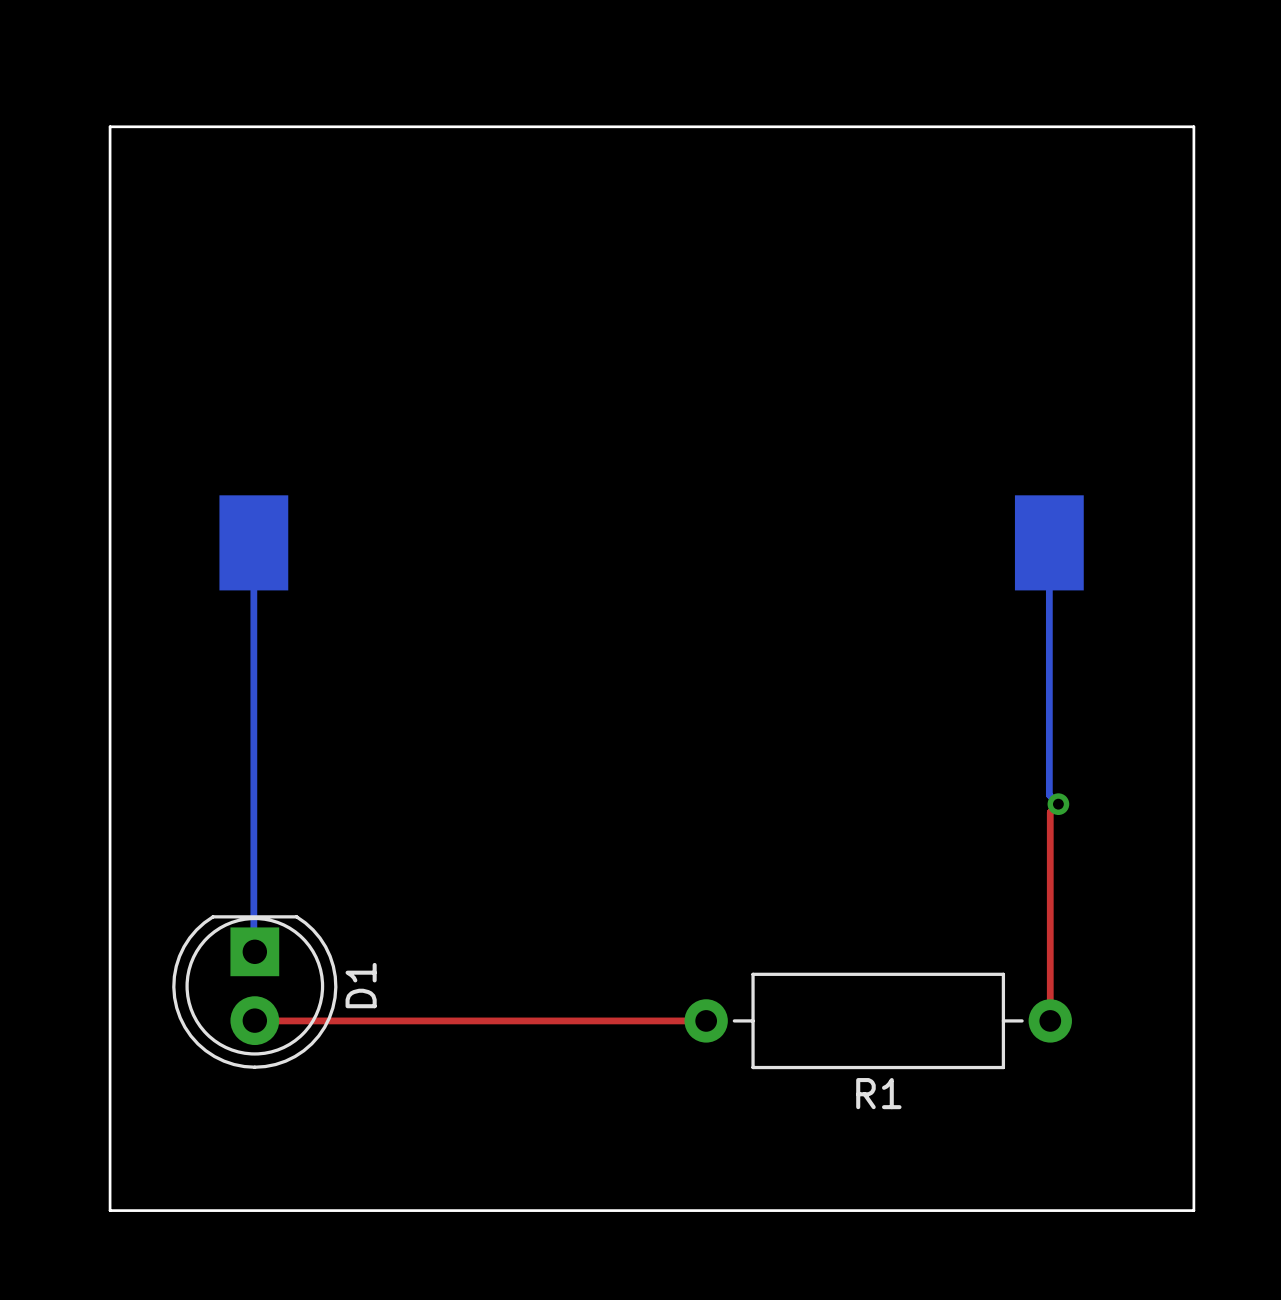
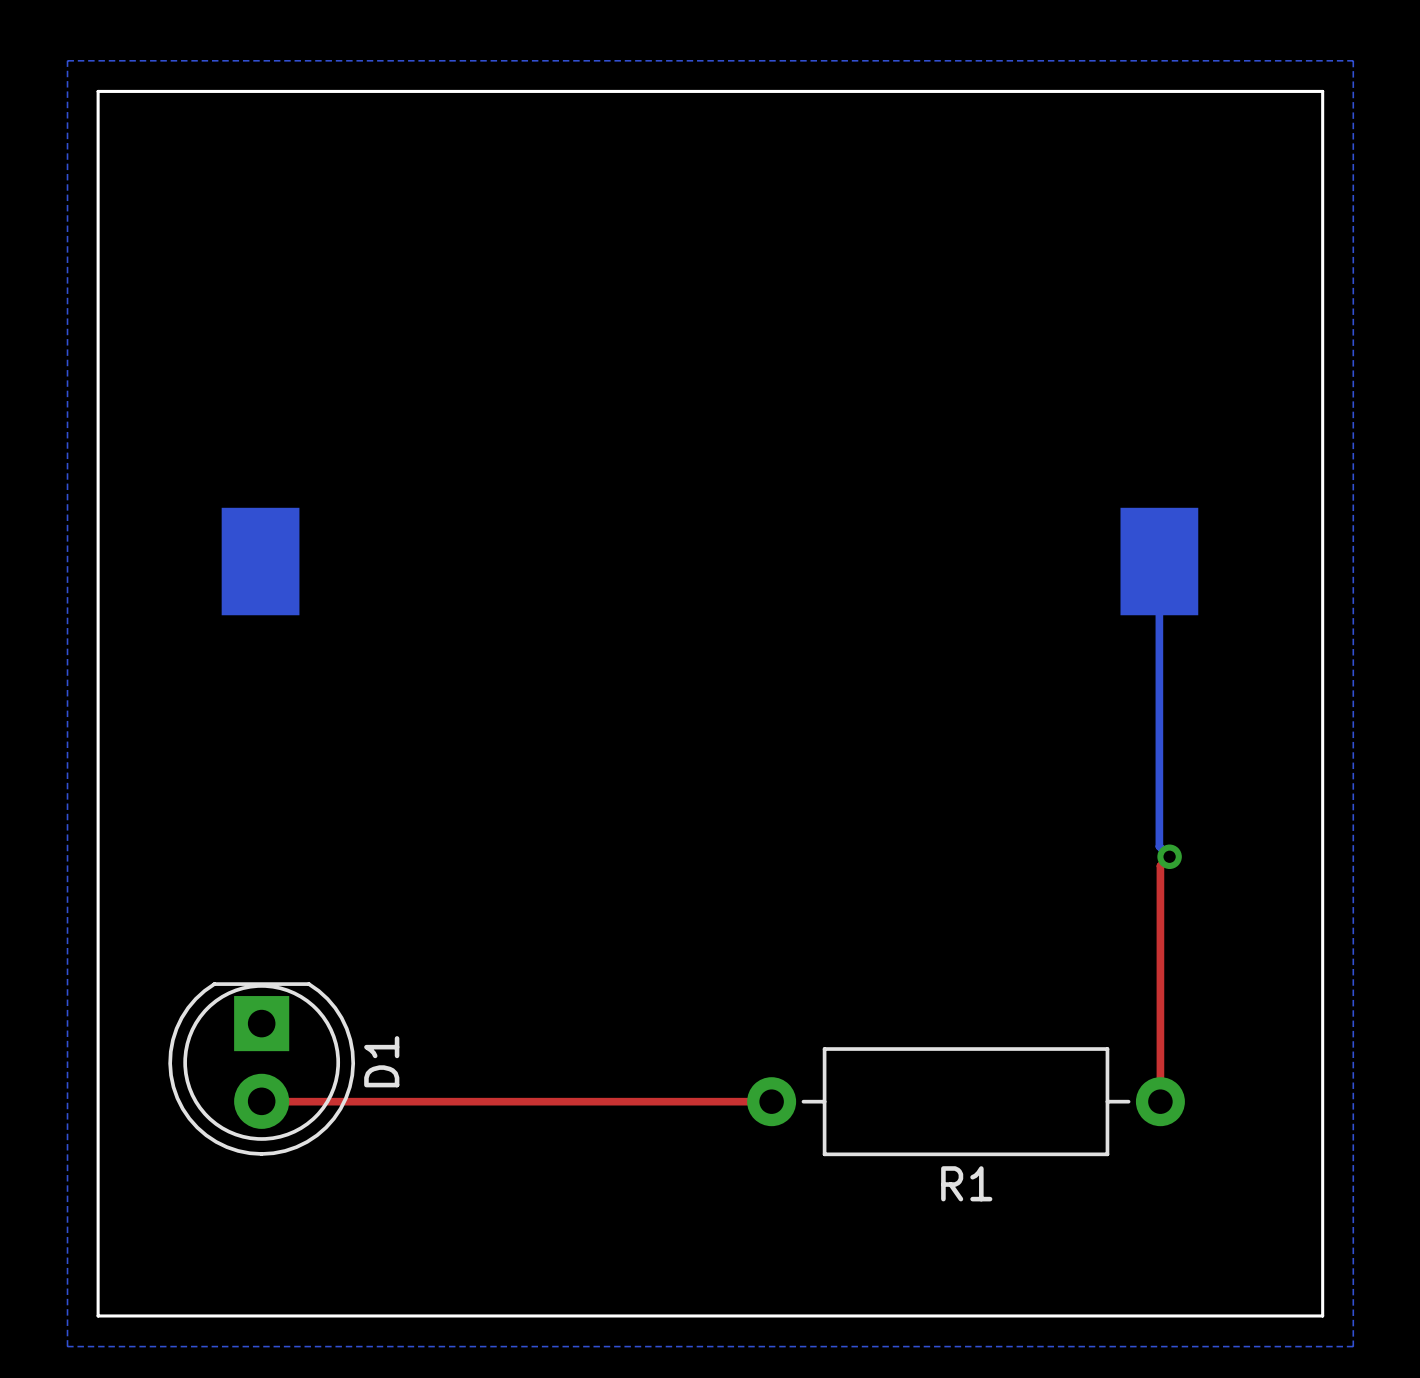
bottom zone outline: none -> (67, 60) (1353, 60) (1353, 1346) (67, 1346) (67, 60)
bottom track: (253, 542) (253, 950) -> none

